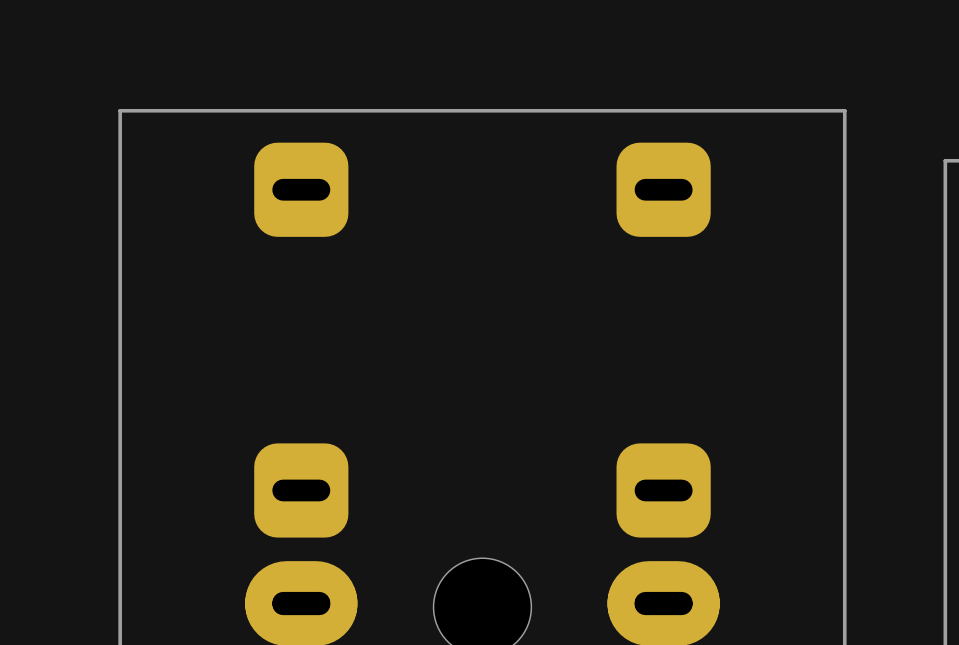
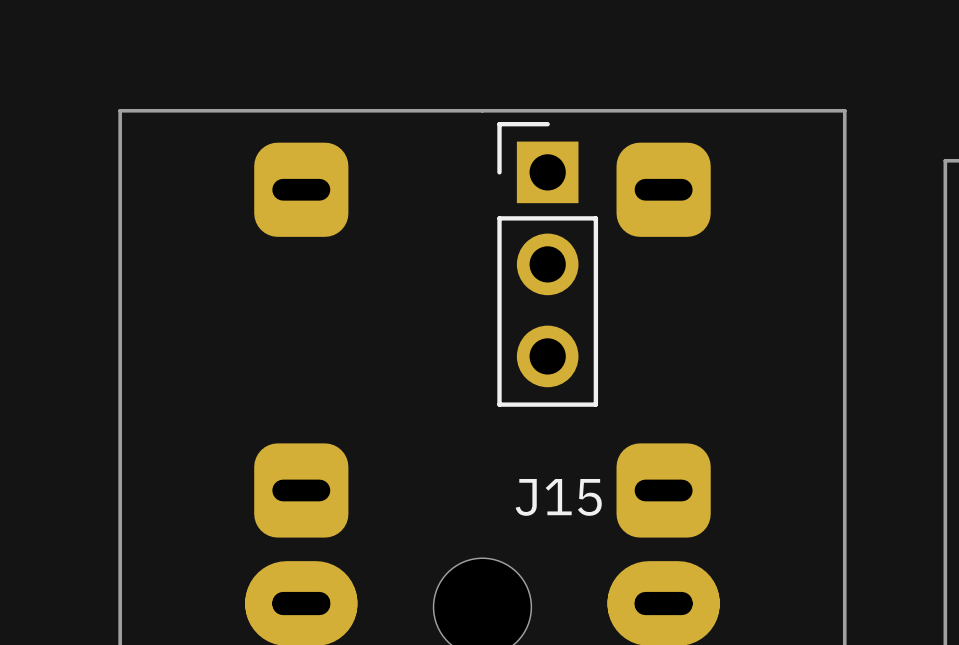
J15: none -> (547, 264)

